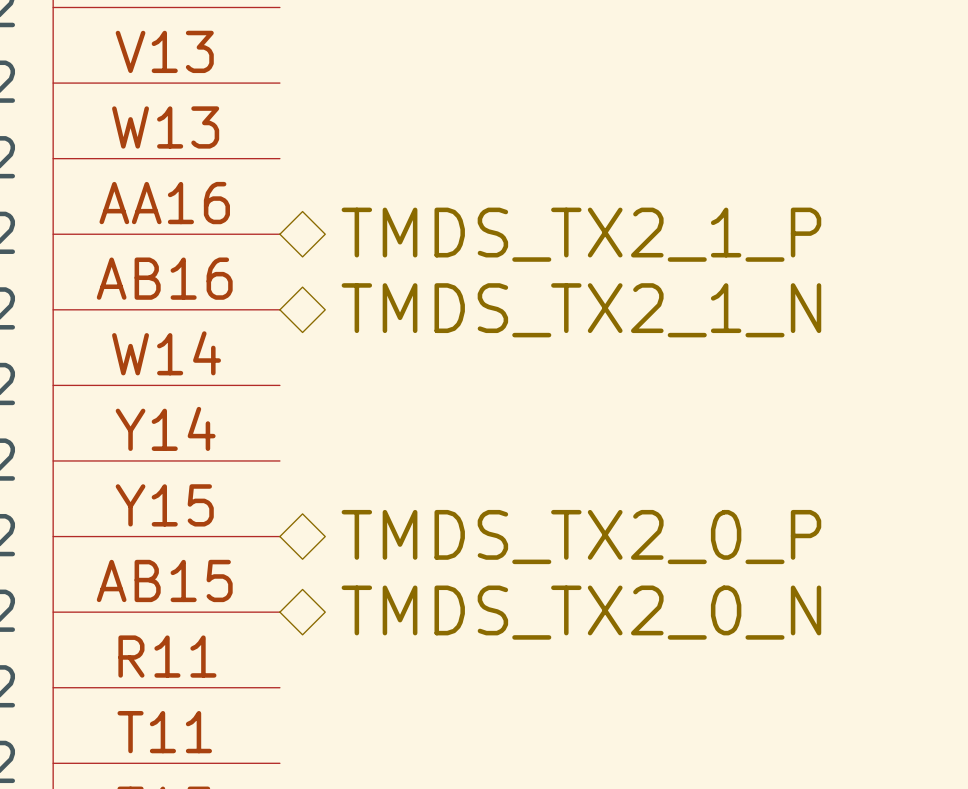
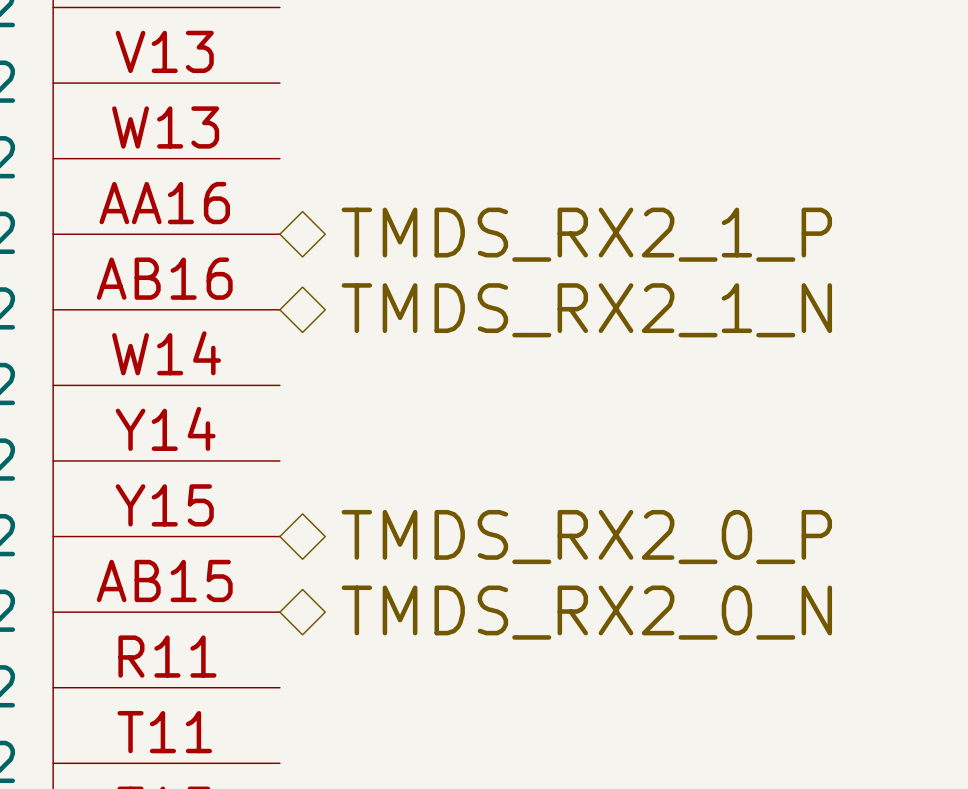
hierarchical label: TMDS_TX2_1_P (581, 234) -> TMDS_RX2_1_P (586, 234)
hierarchical label: TMDS_TX2_1_N (581, 310) -> TMDS_RX2_1_N (586, 310)
hierarchical label: TMDS_TX2_0_P (581, 537) -> TMDS_RX2_0_P (586, 537)
hierarchical label: TMDS_TX2_0_N (581, 612) -> TMDS_RX2_0_N (586, 612)

